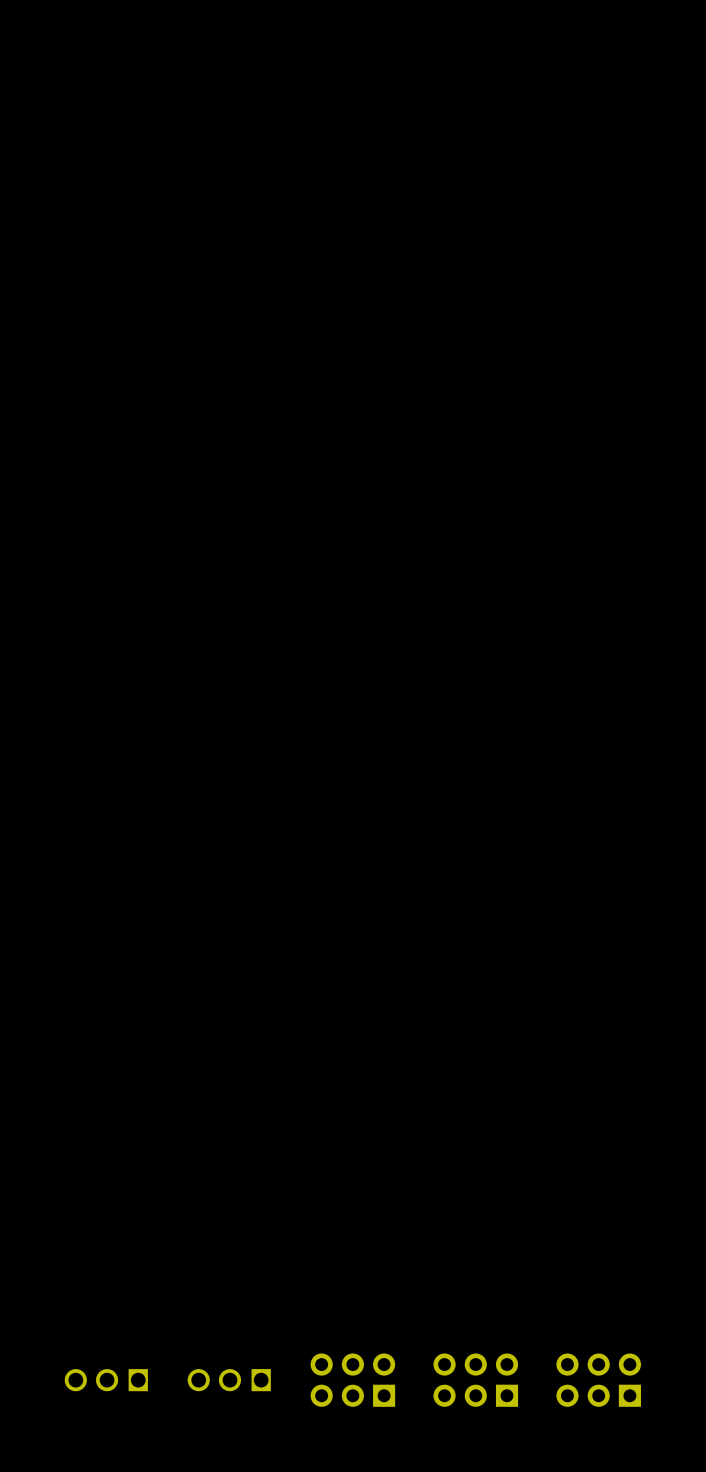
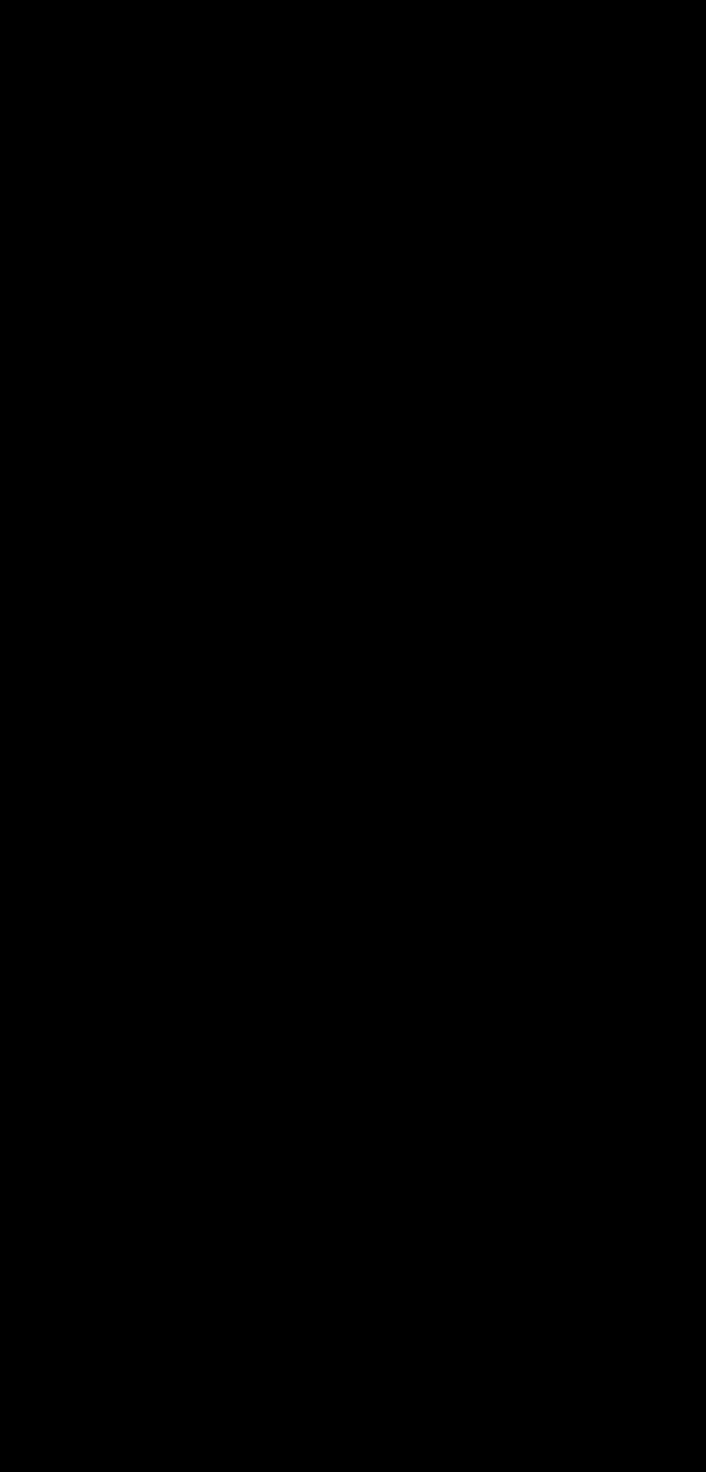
part: (106, 1380) -> none
part: (229, 1380) -> none
part: (352, 1380) -> none
part: (475, 1380) -> none
part: (598, 1380) -> none

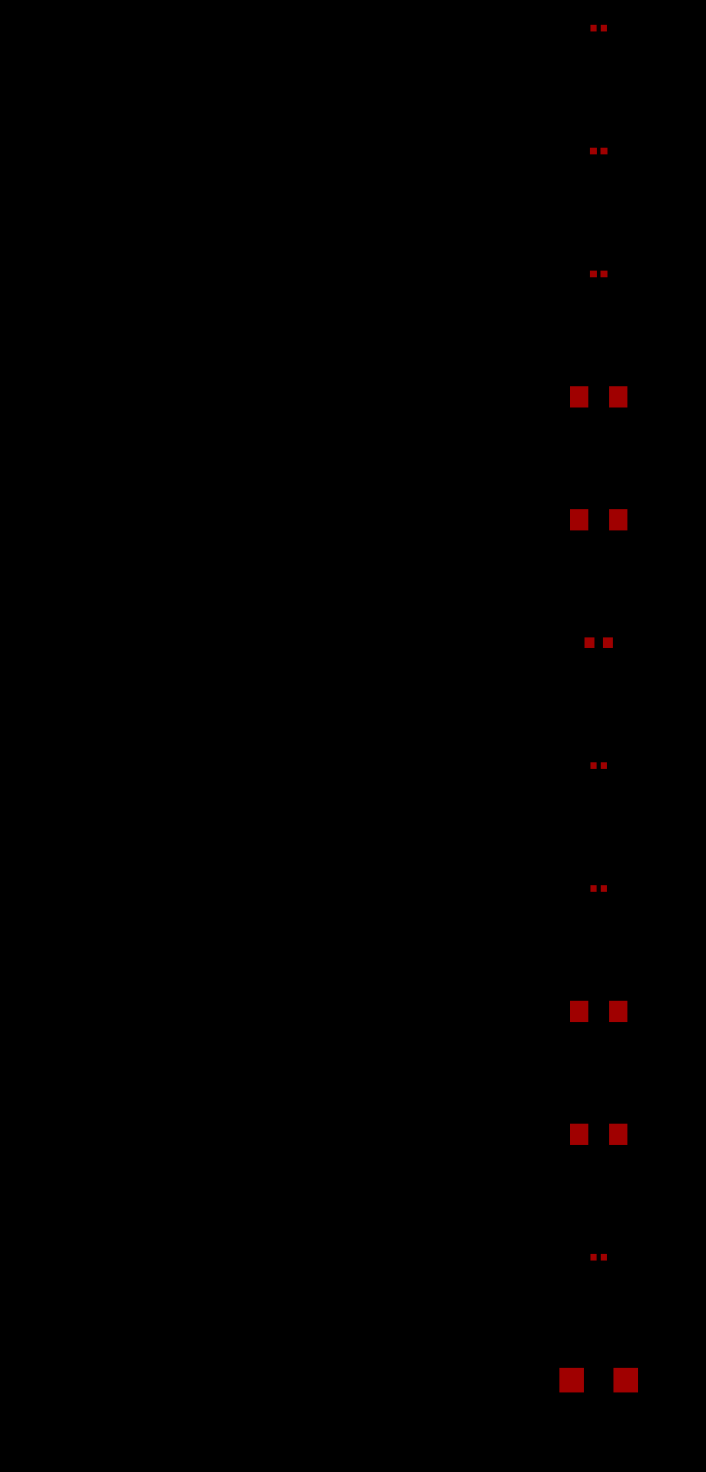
part: none -> (598, 28)
part: none -> (598, 151)
part: none -> (598, 273)
part: none -> (598, 396)
part: none -> (598, 519)
part: none -> (598, 642)
part: none -> (598, 765)
part: none -> (598, 888)
part: none -> (598, 1011)
part: none -> (598, 1134)
part: none -> (598, 1257)
part: none -> (598, 1380)

